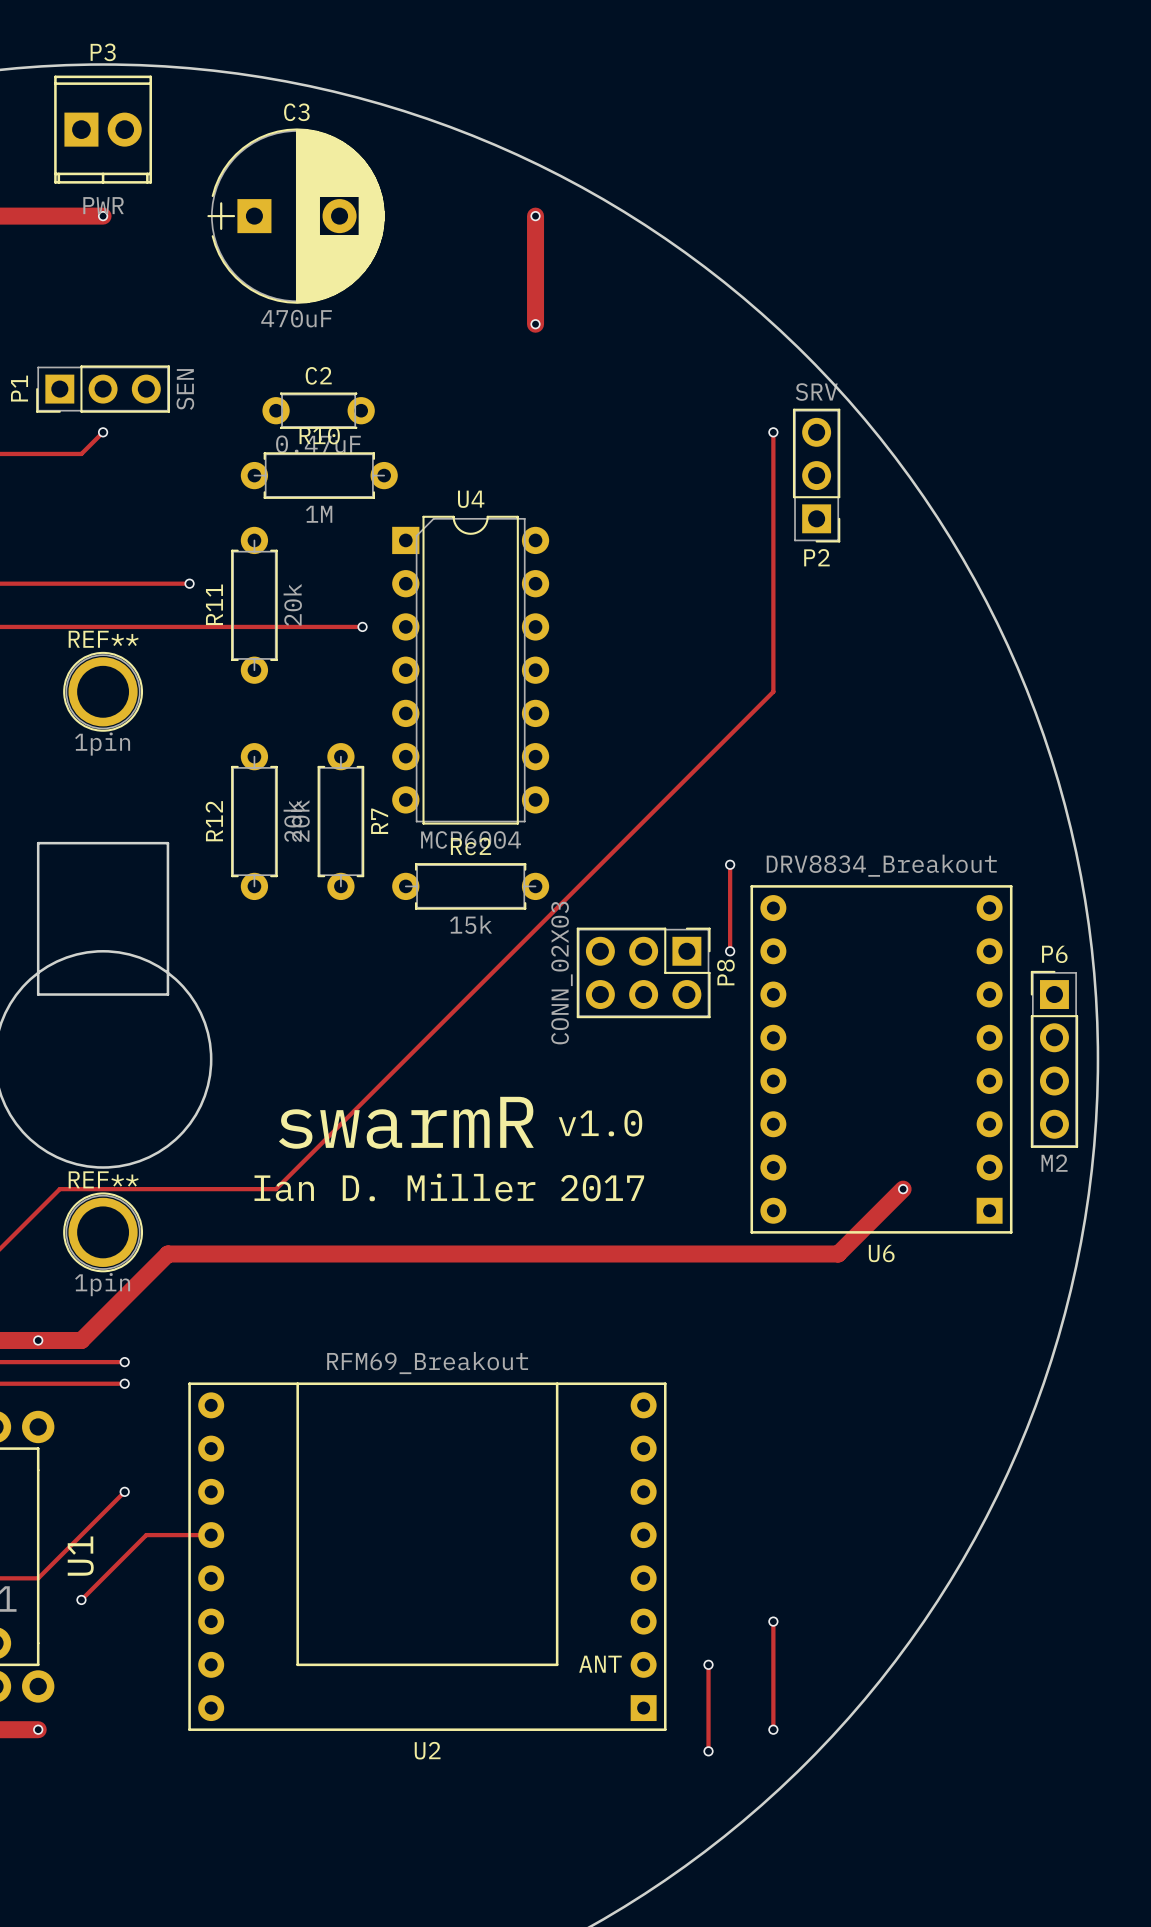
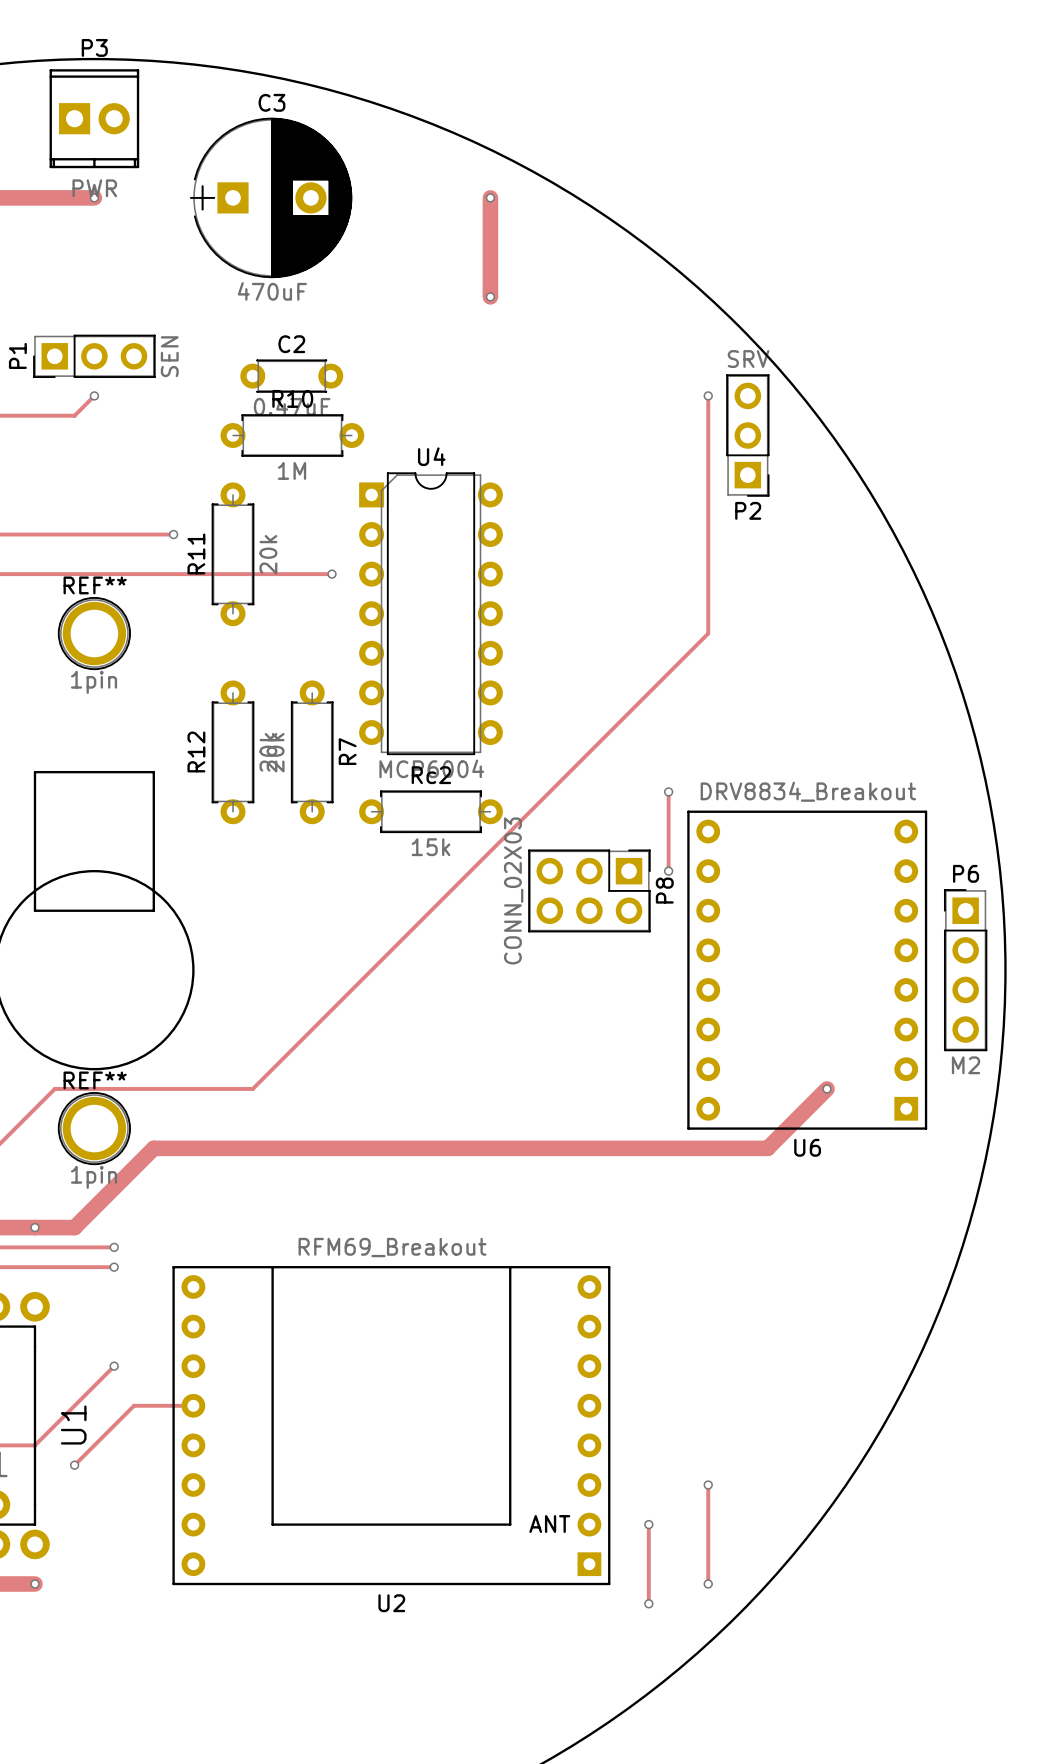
text: swarmR (406, 1122) -> none
text: v1.0 (600, 1123) -> none
text: Ian D. Miller 2017 (449, 1187) -> none

